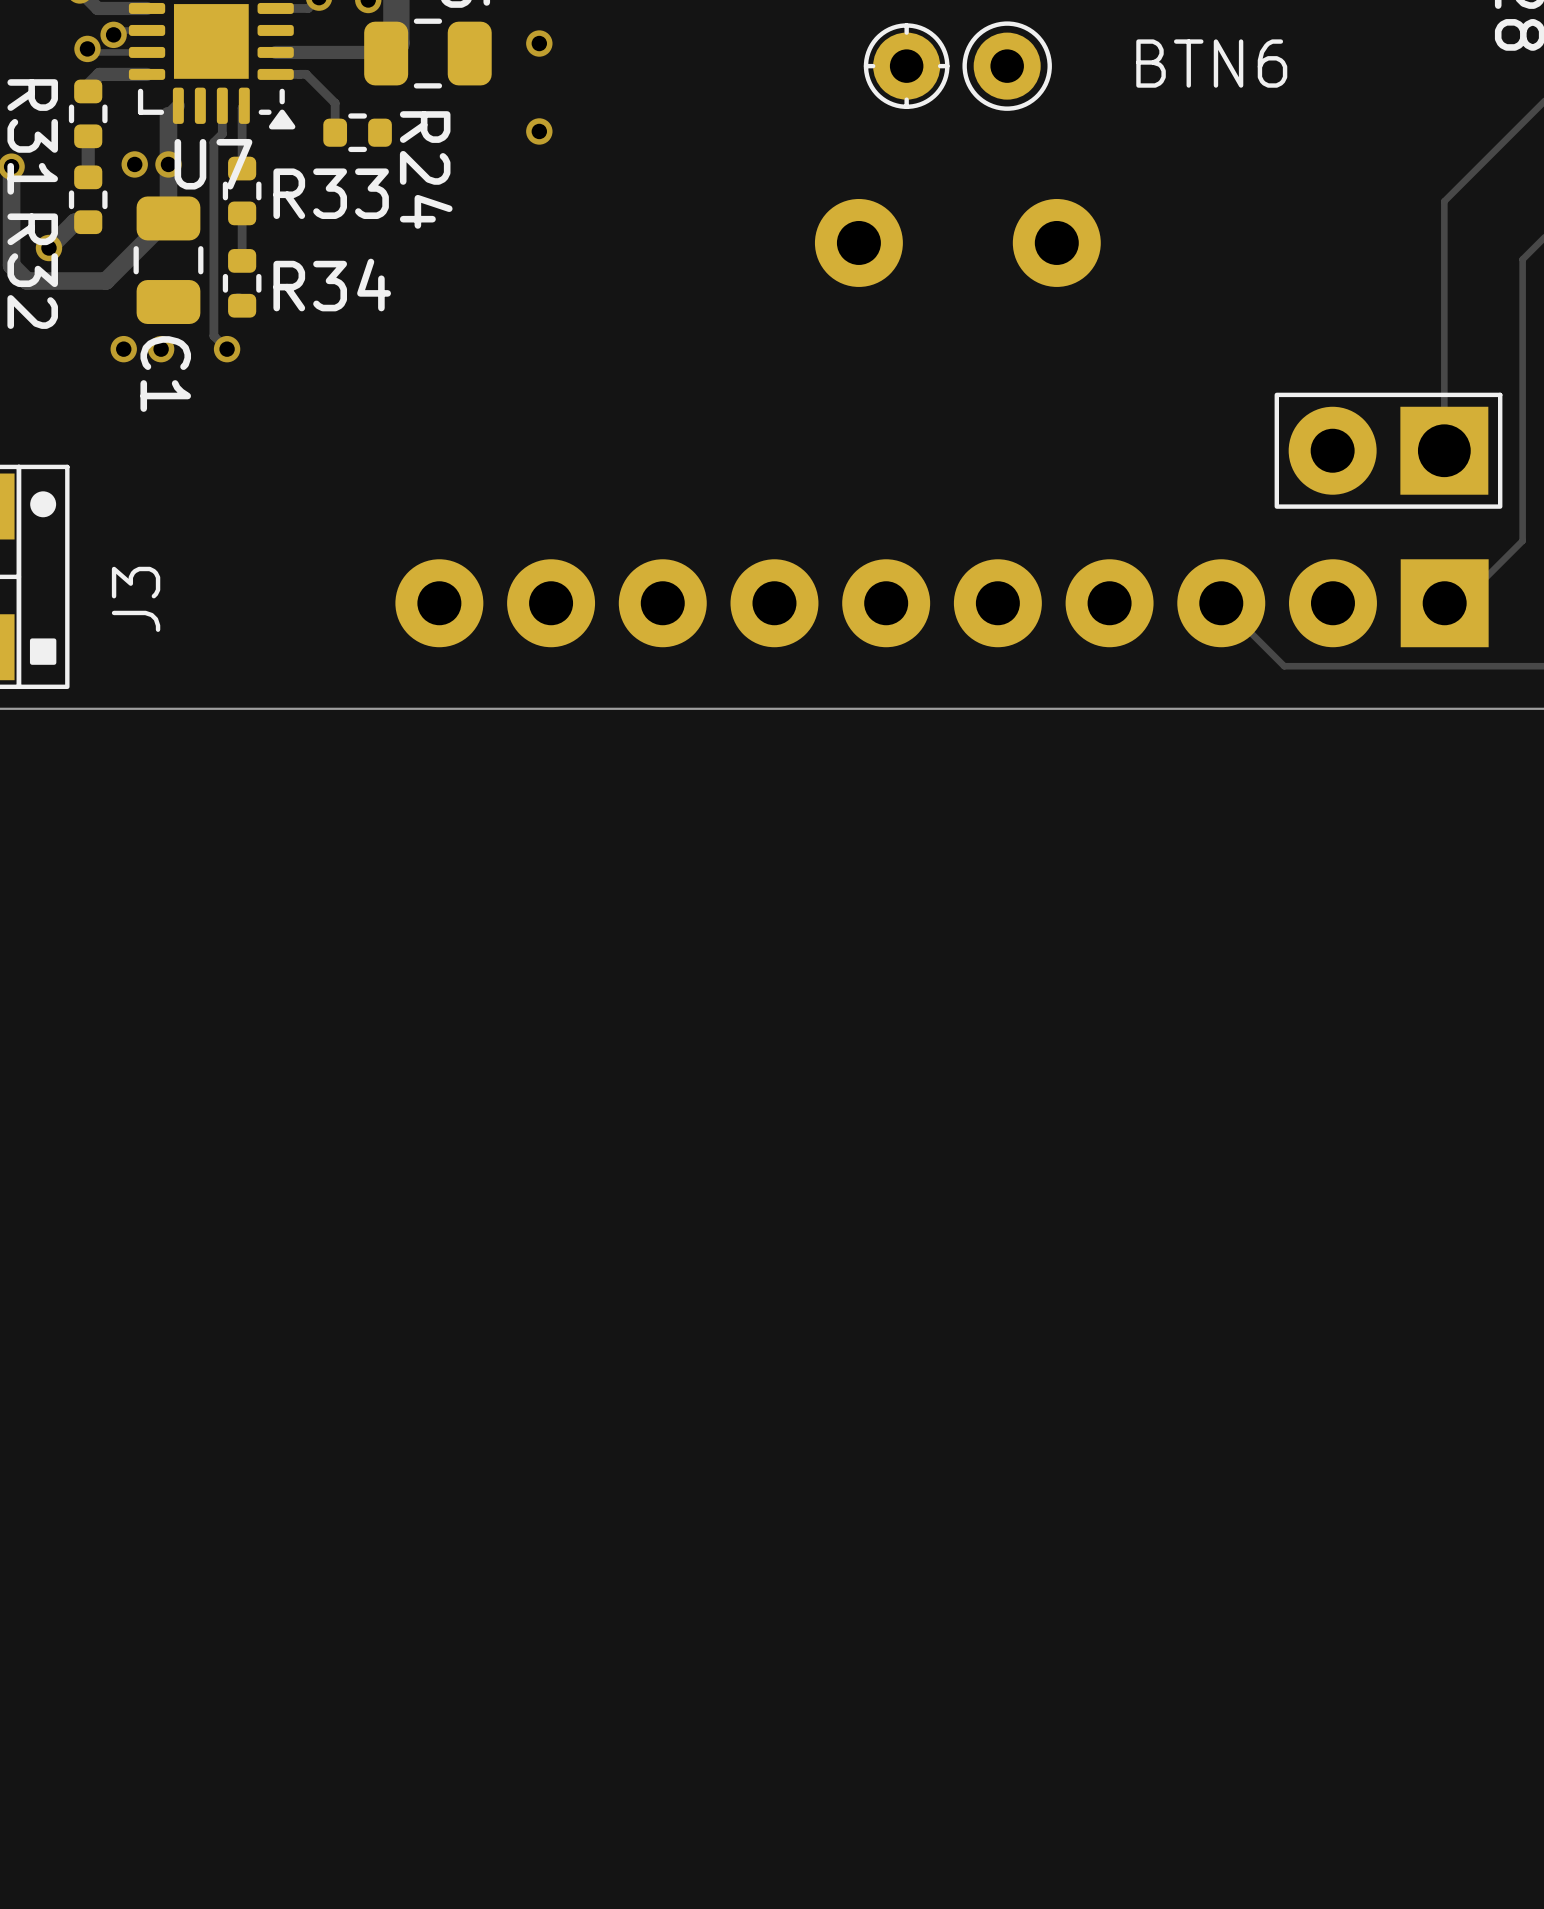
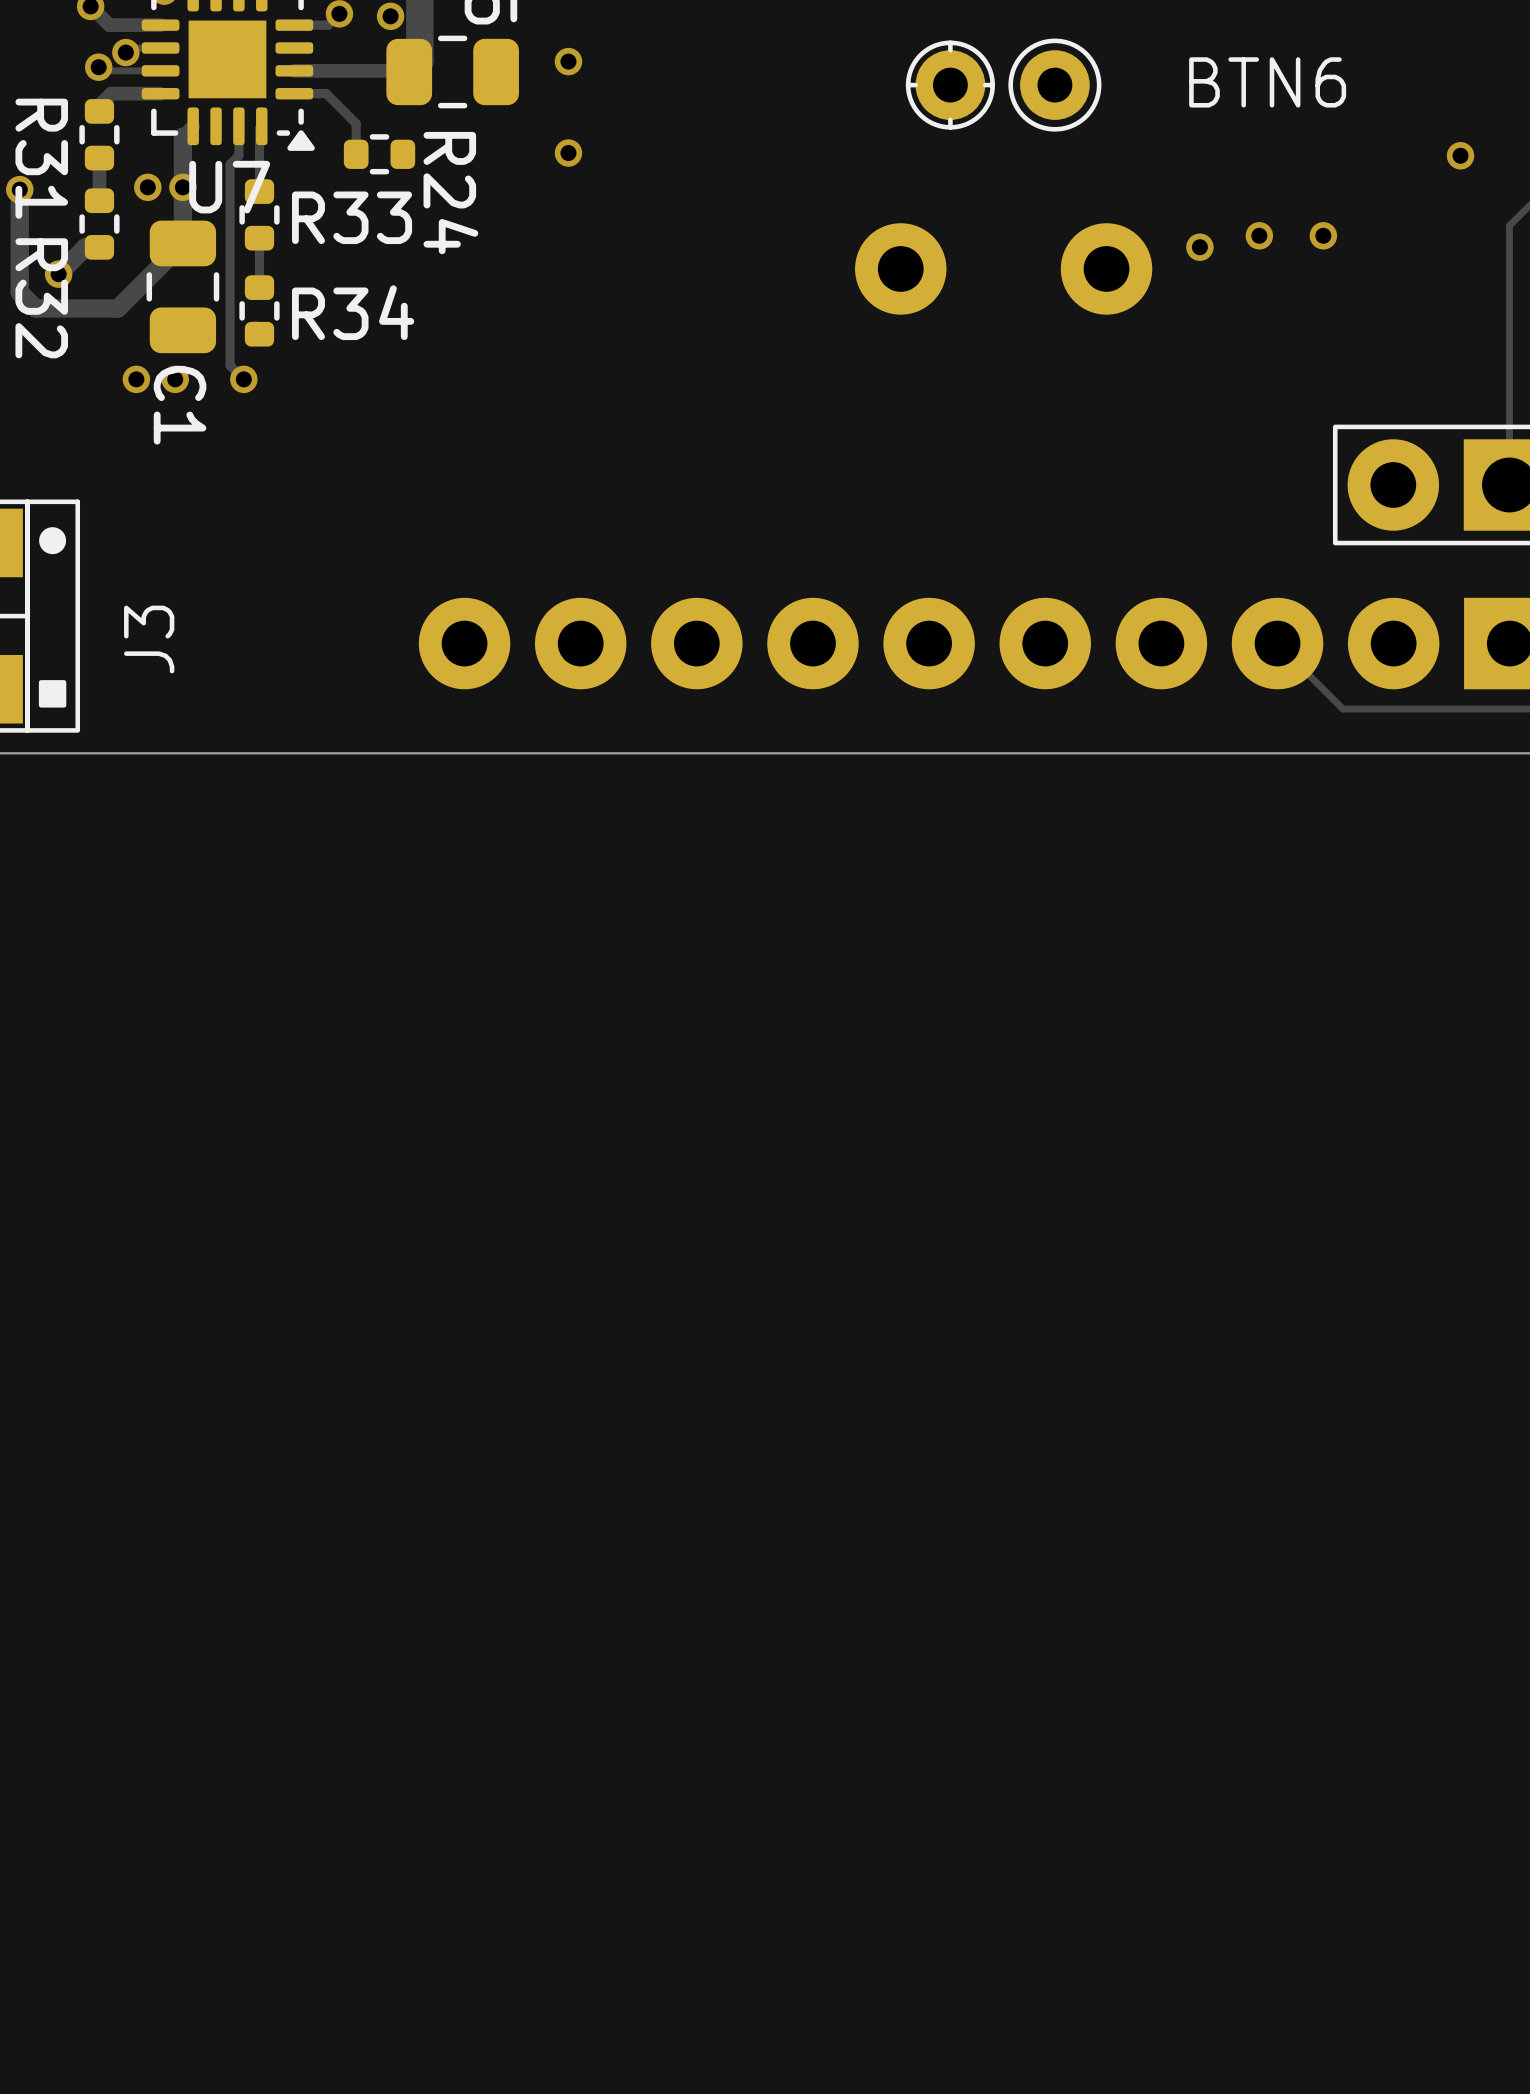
via: none -> (1460, 155)
via: none -> (1259, 235)
via: none -> (1323, 235)
via: none -> (1199, 247)

